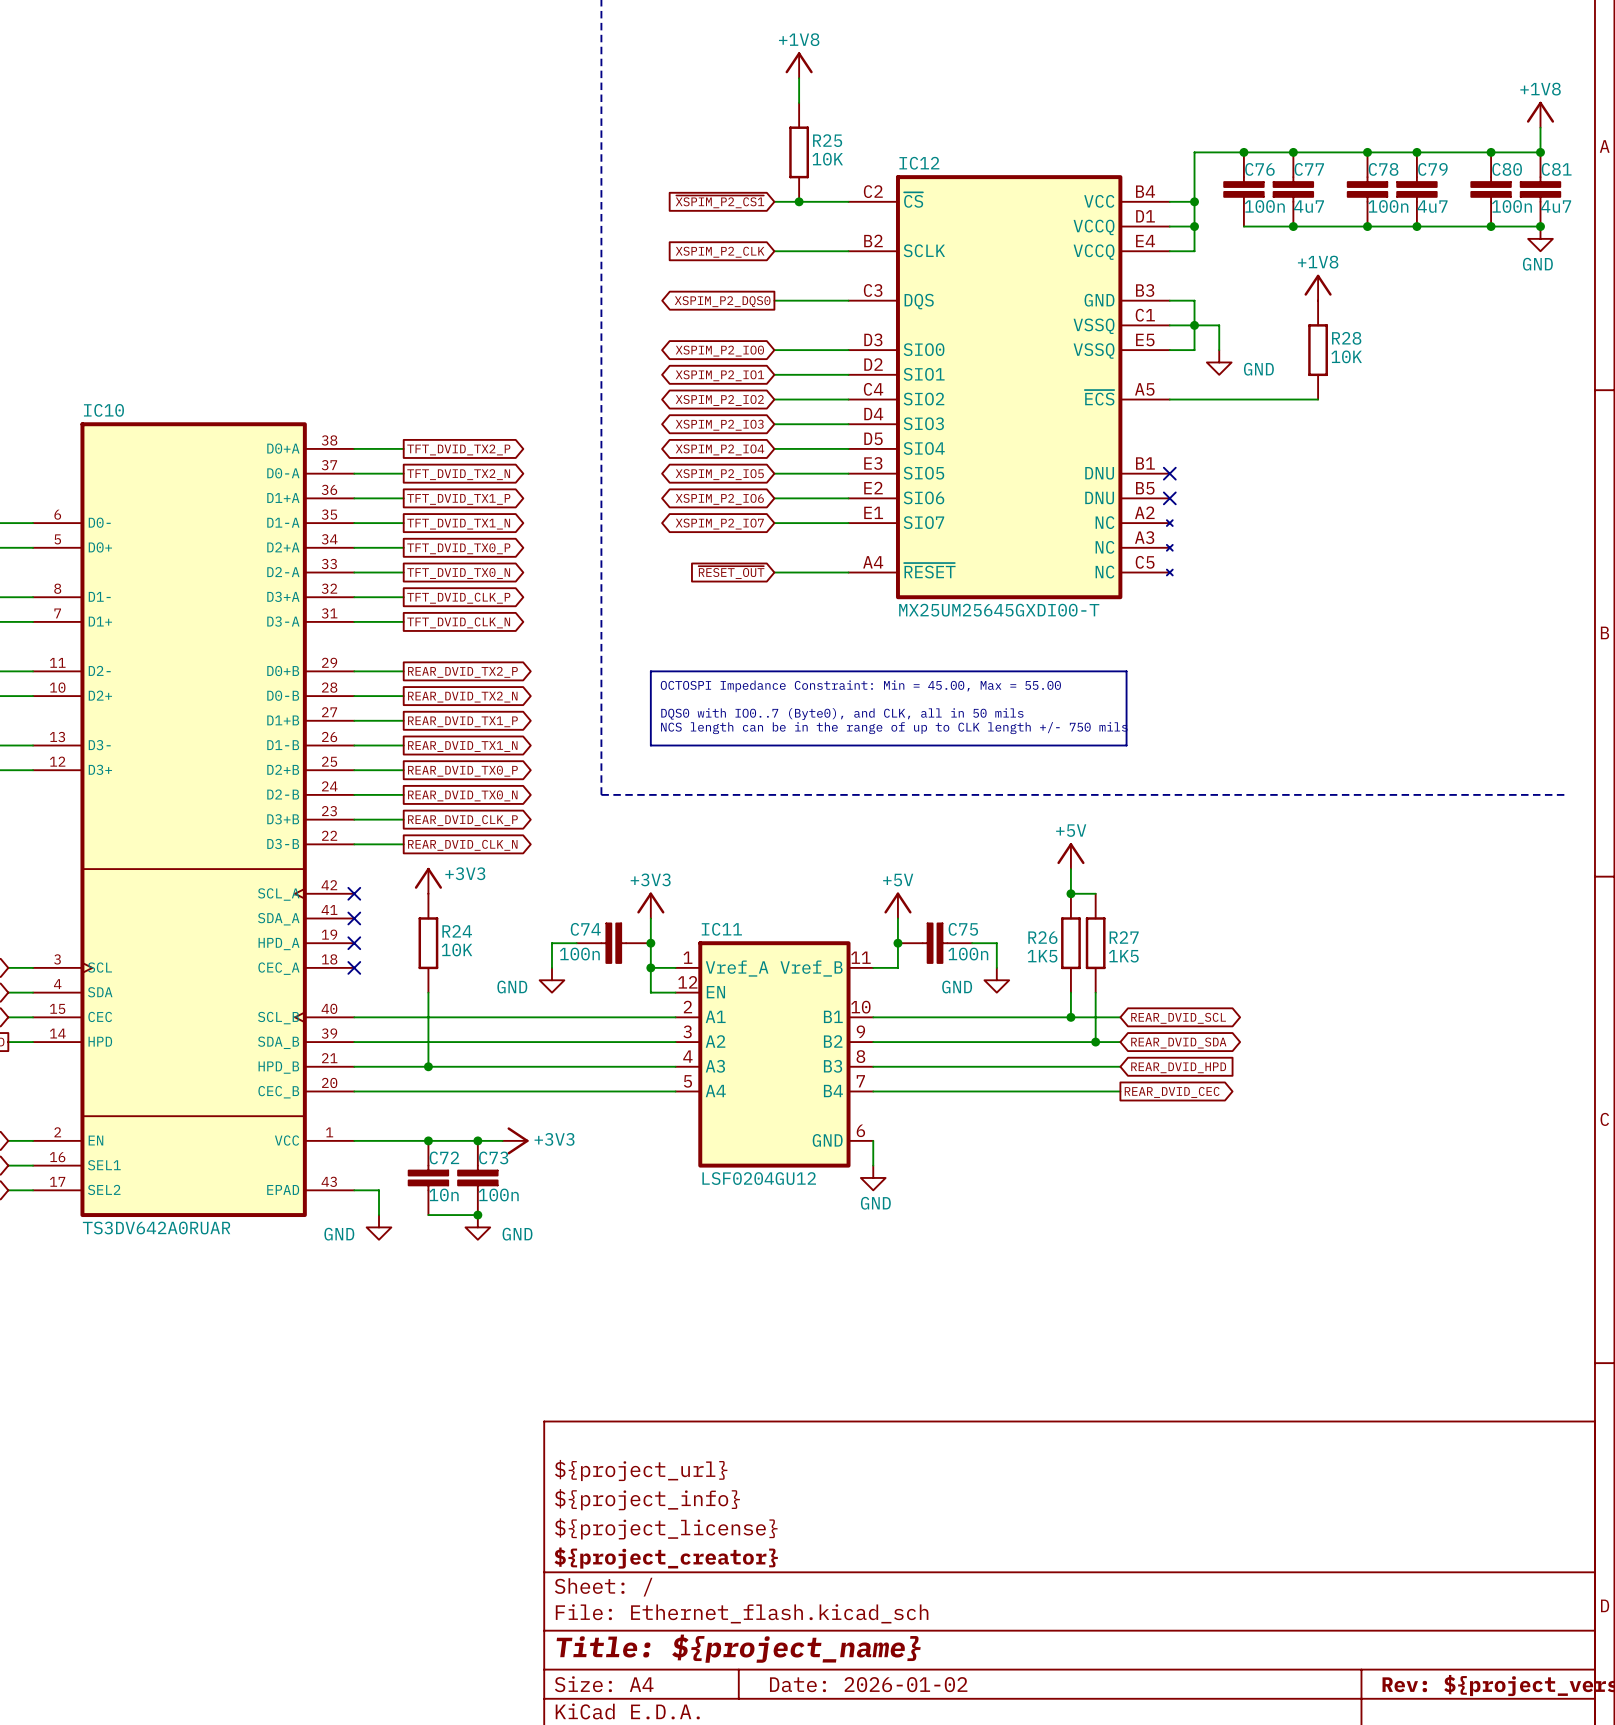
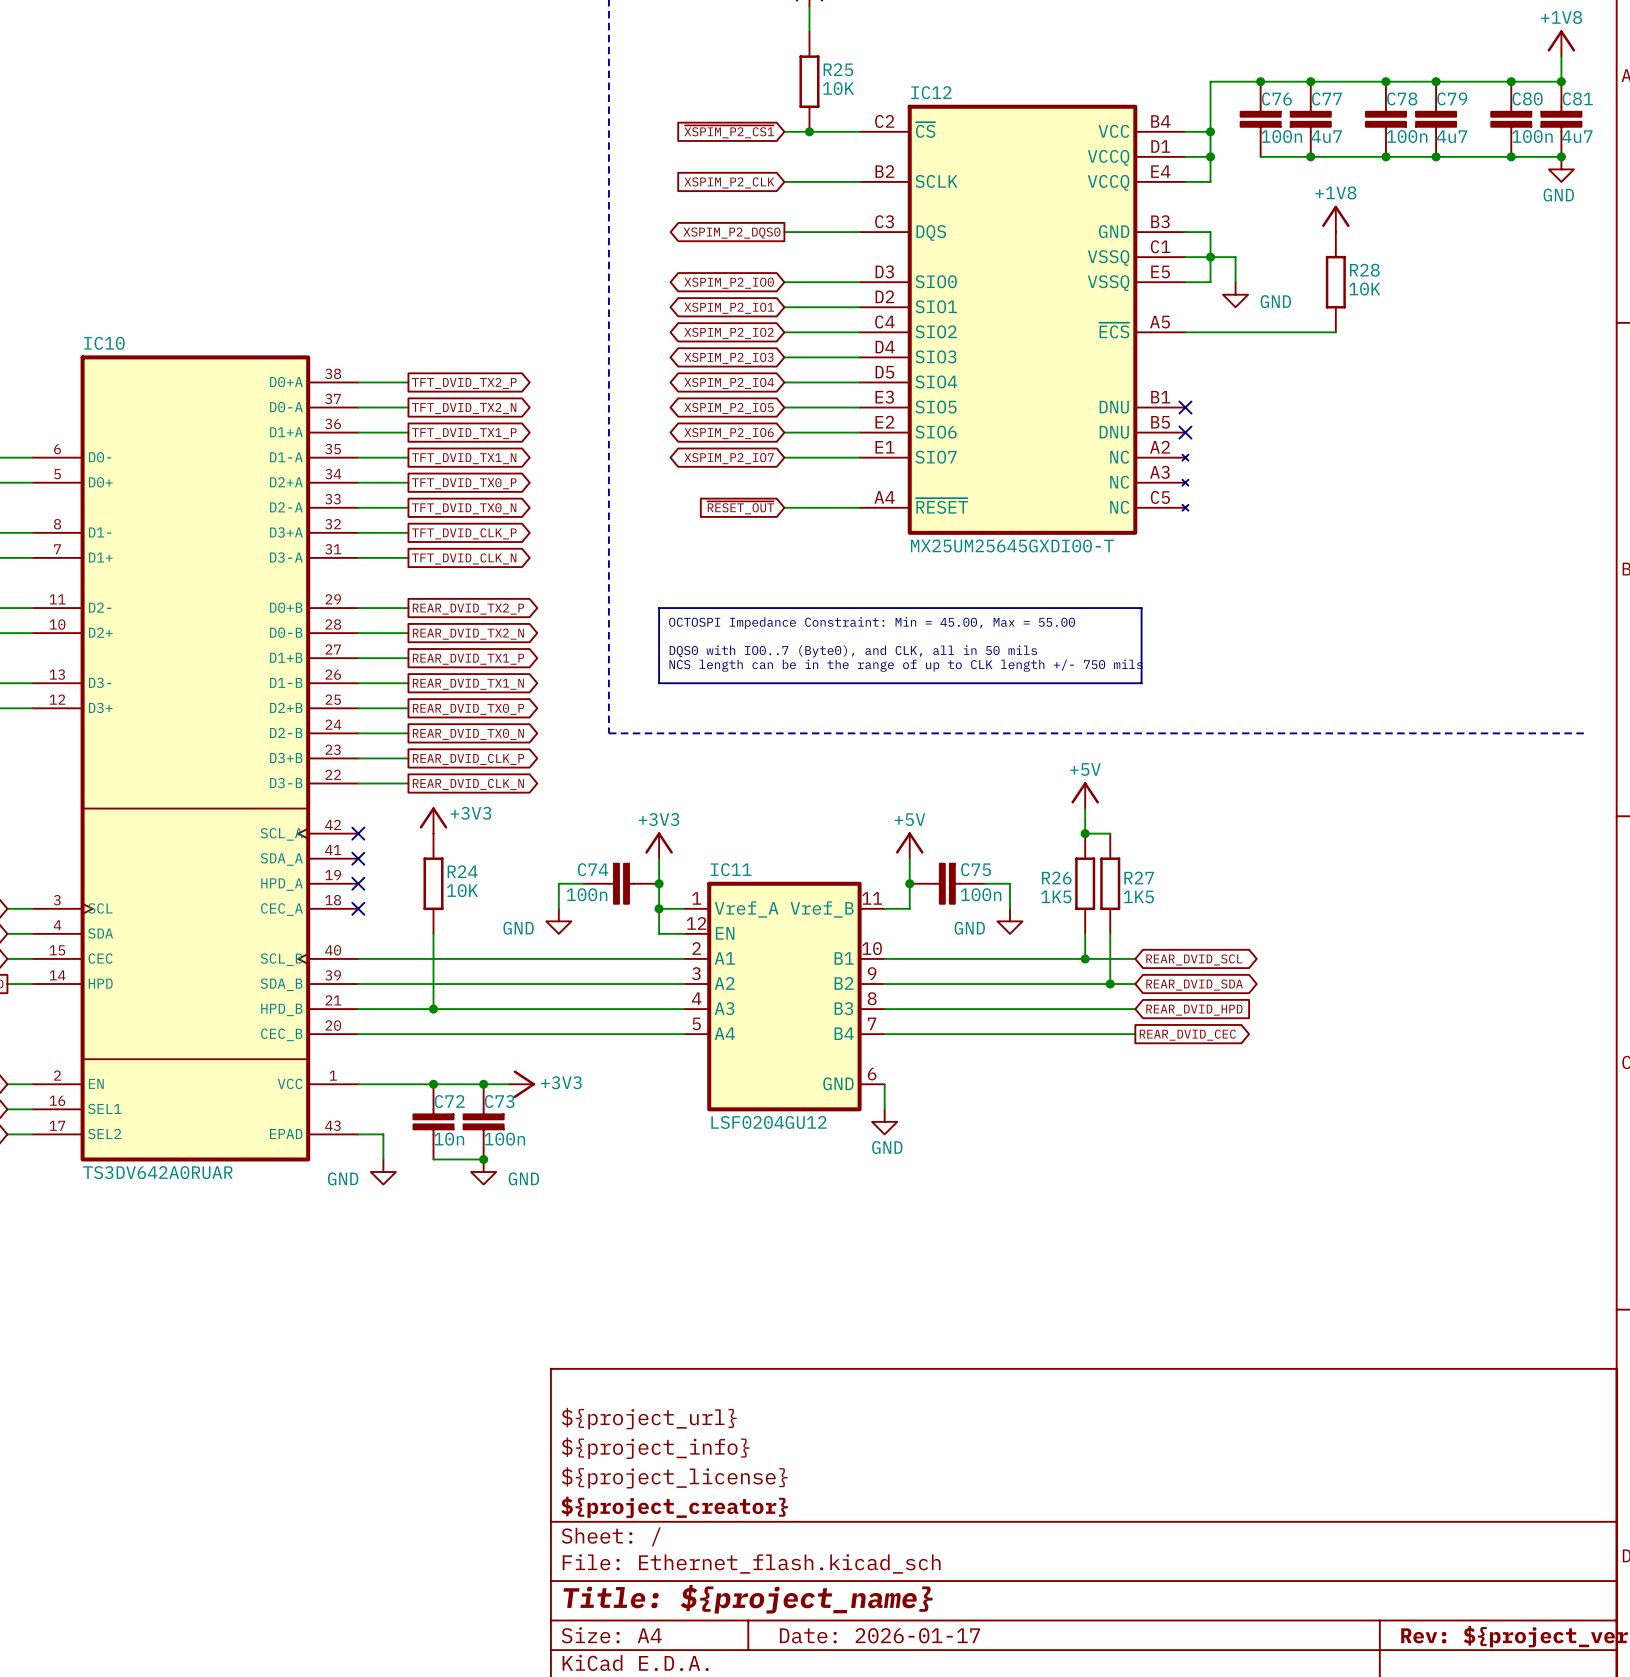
title block: Date: 2026-01-02 (868, 1684) -> Date: 2026-01-17 (879, 1635)

